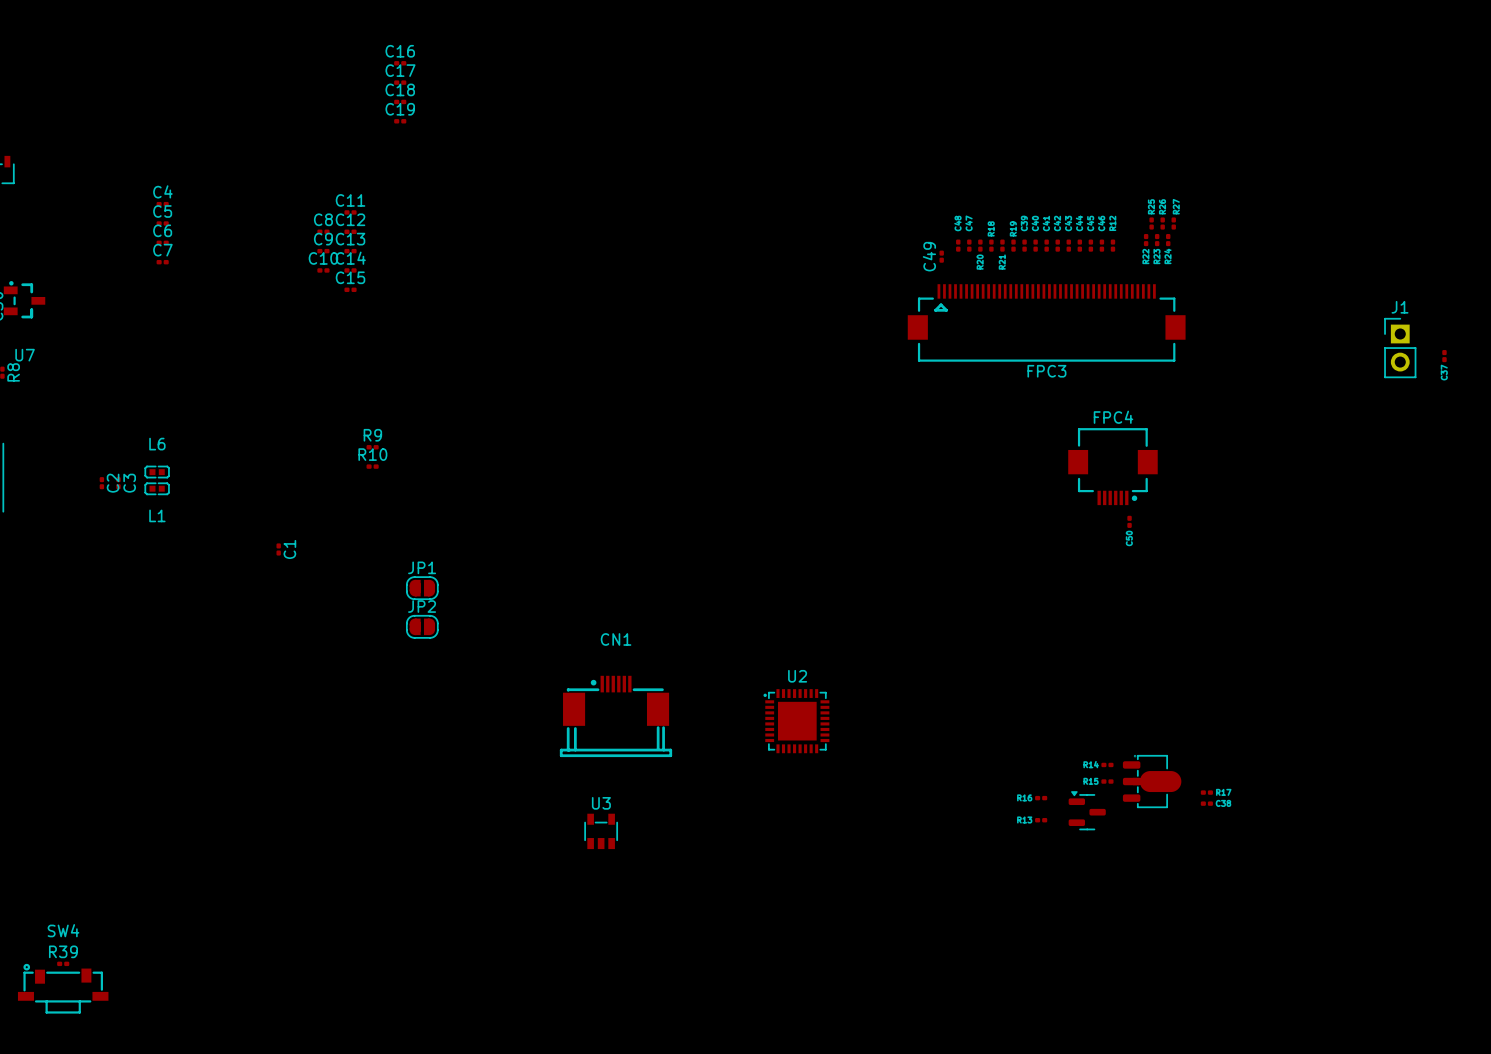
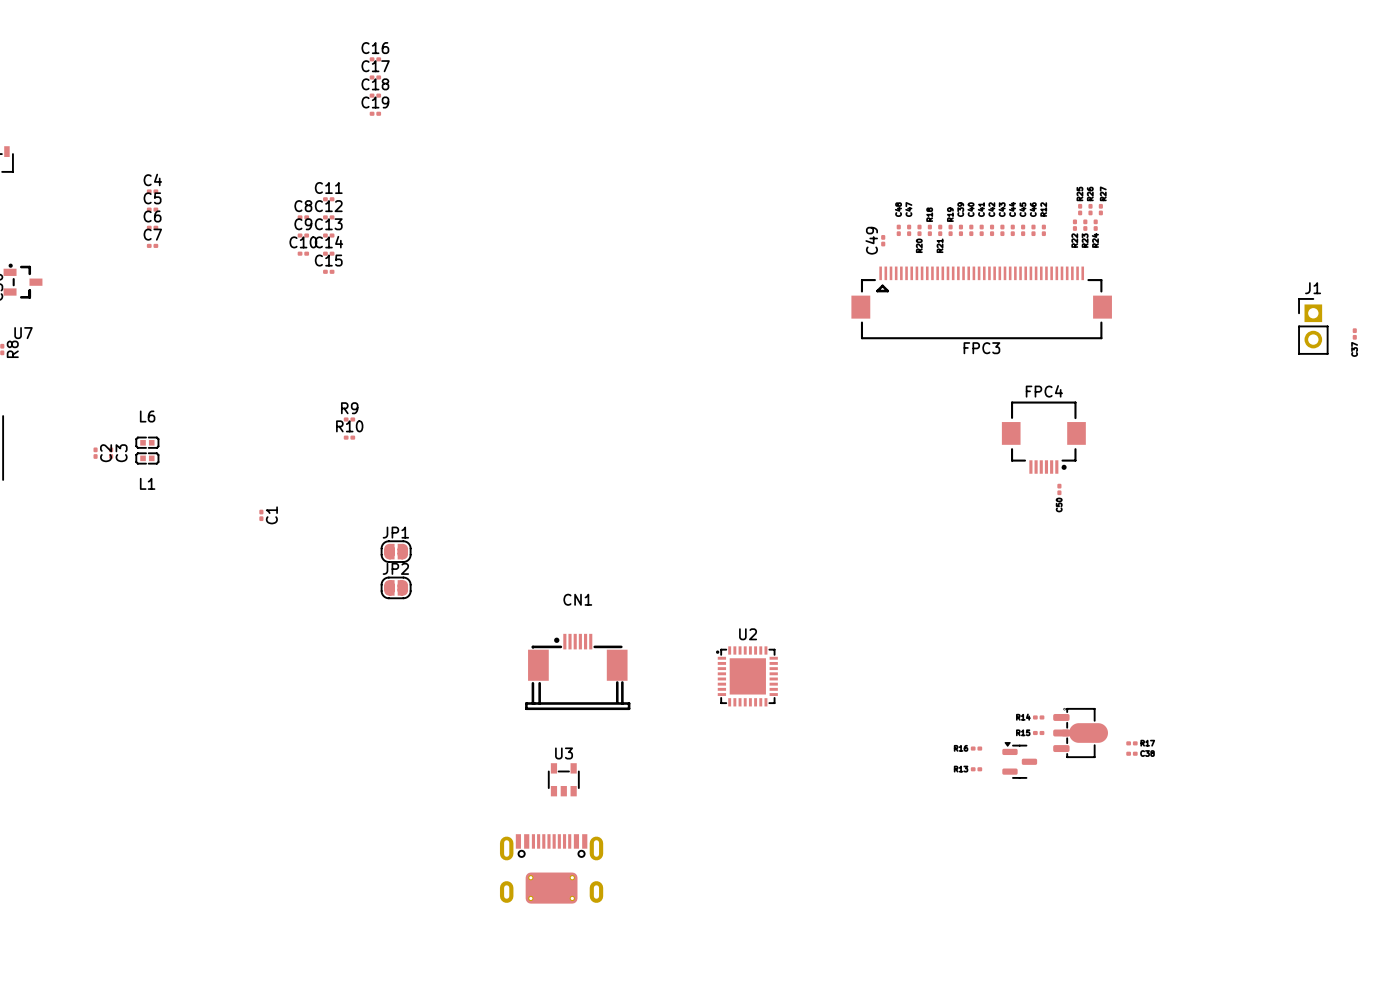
part: none -> (551, 868)
R39: (63, 963) -> none
SW4: (63, 988) -> none

